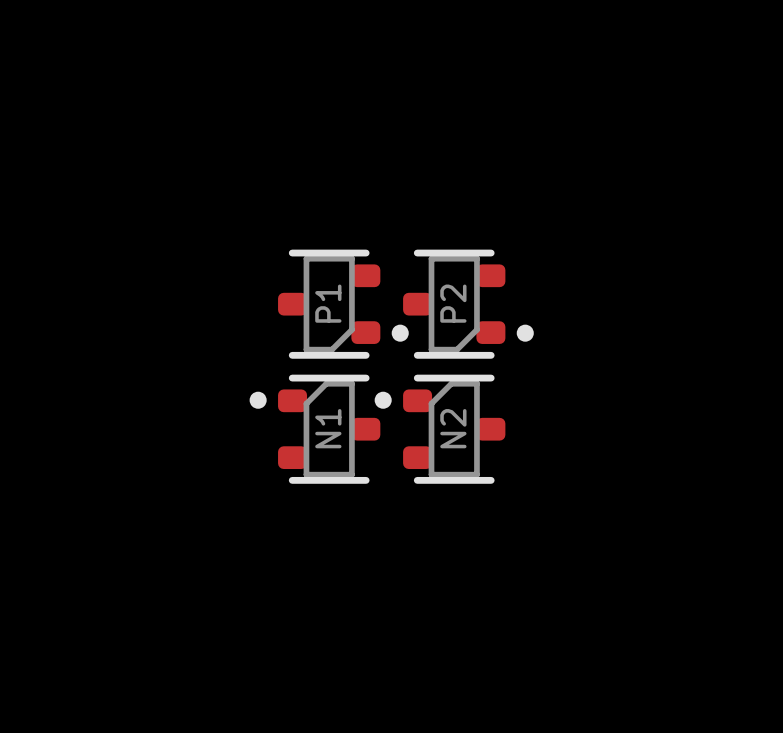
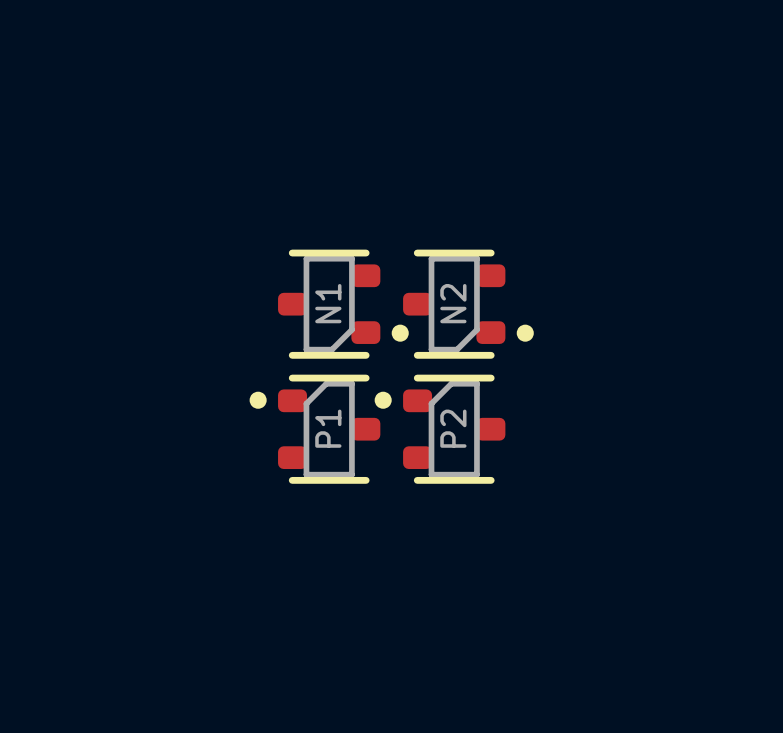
P1 name: P1 (328, 303) -> N1 (328, 303)
P2 name: P2 (453, 303) -> N2 (453, 303)
N1 name: N1 (328, 428) -> P1 (328, 428)
N2 name: N2 (453, 428) -> P2 (453, 428)

